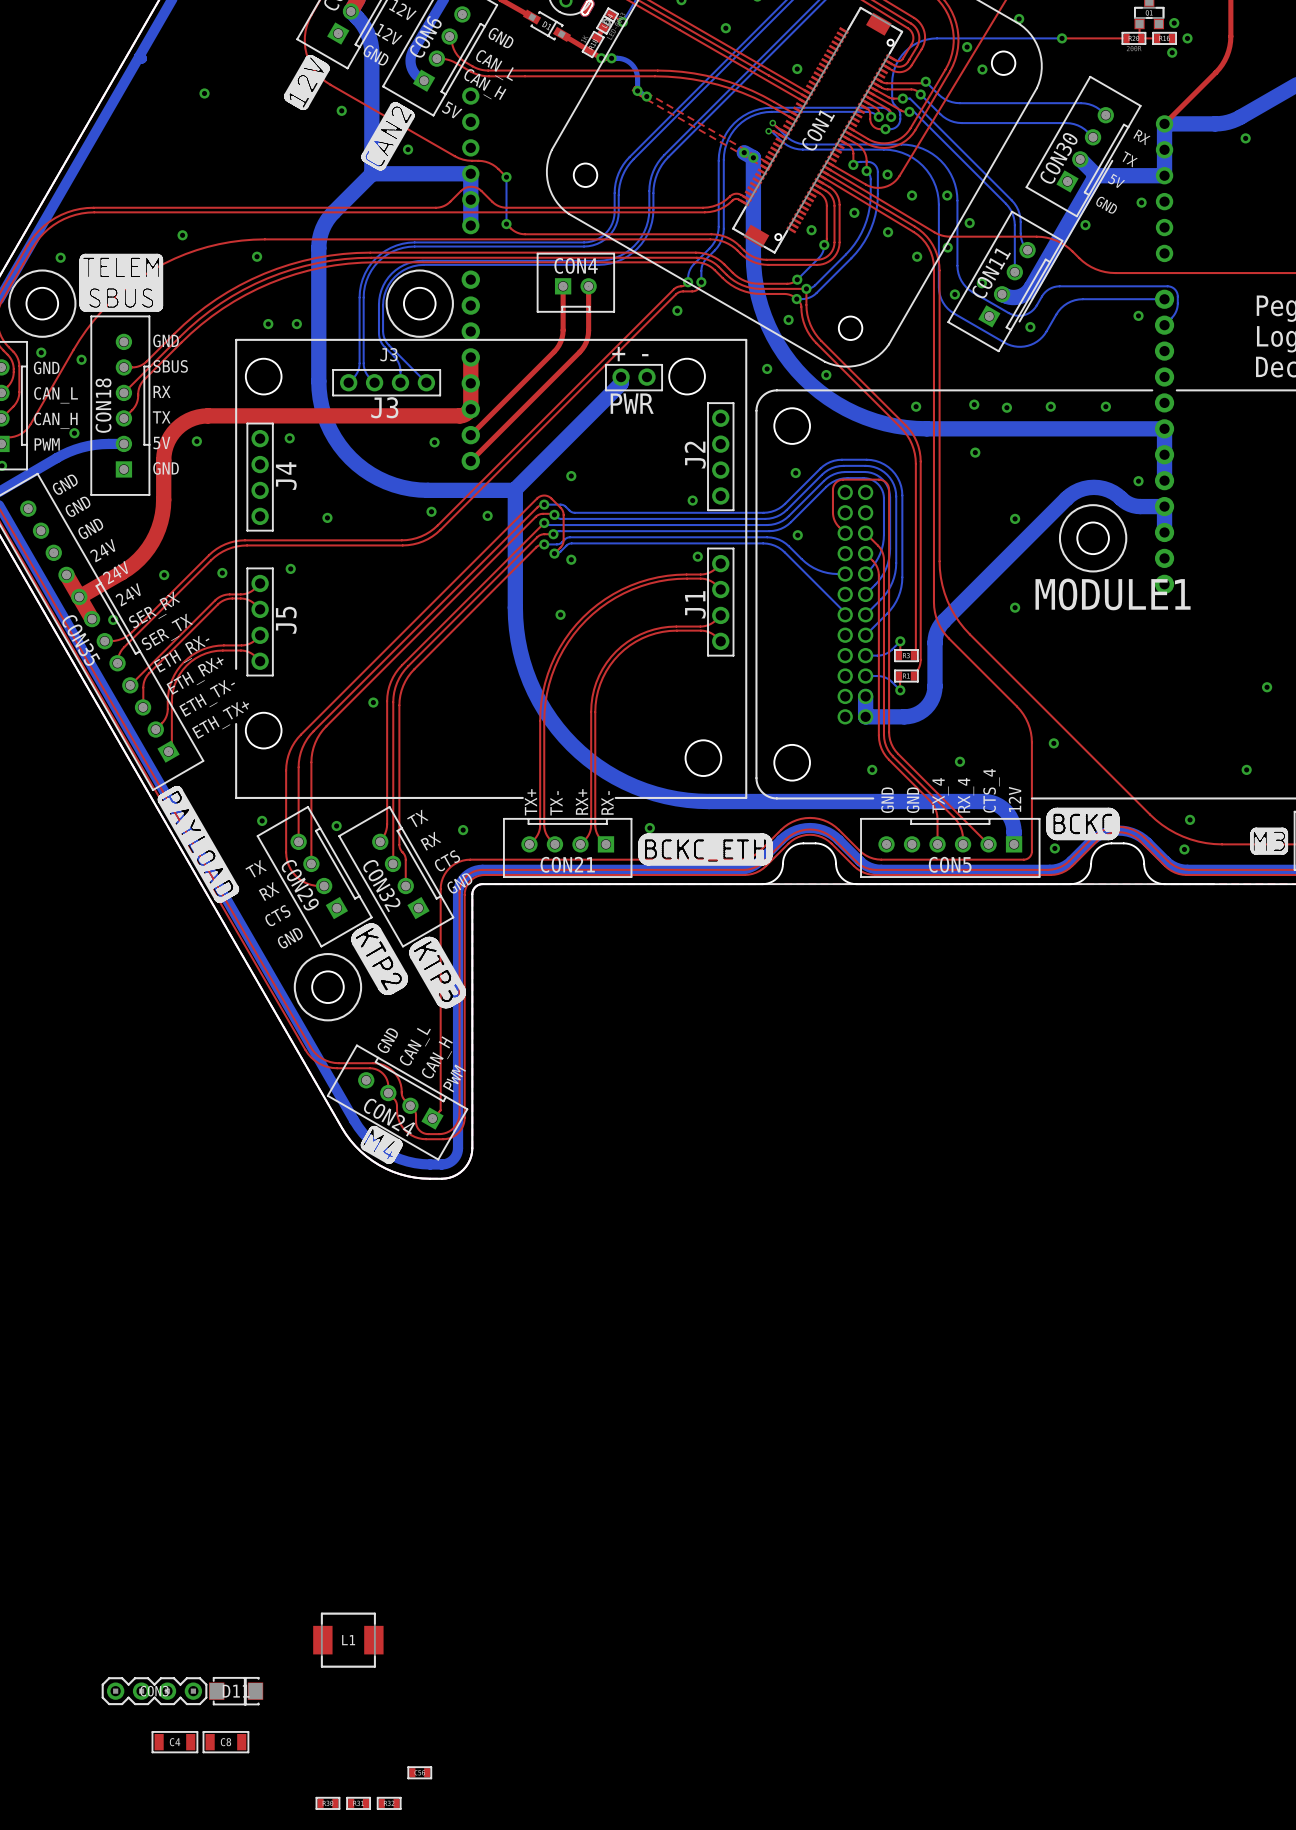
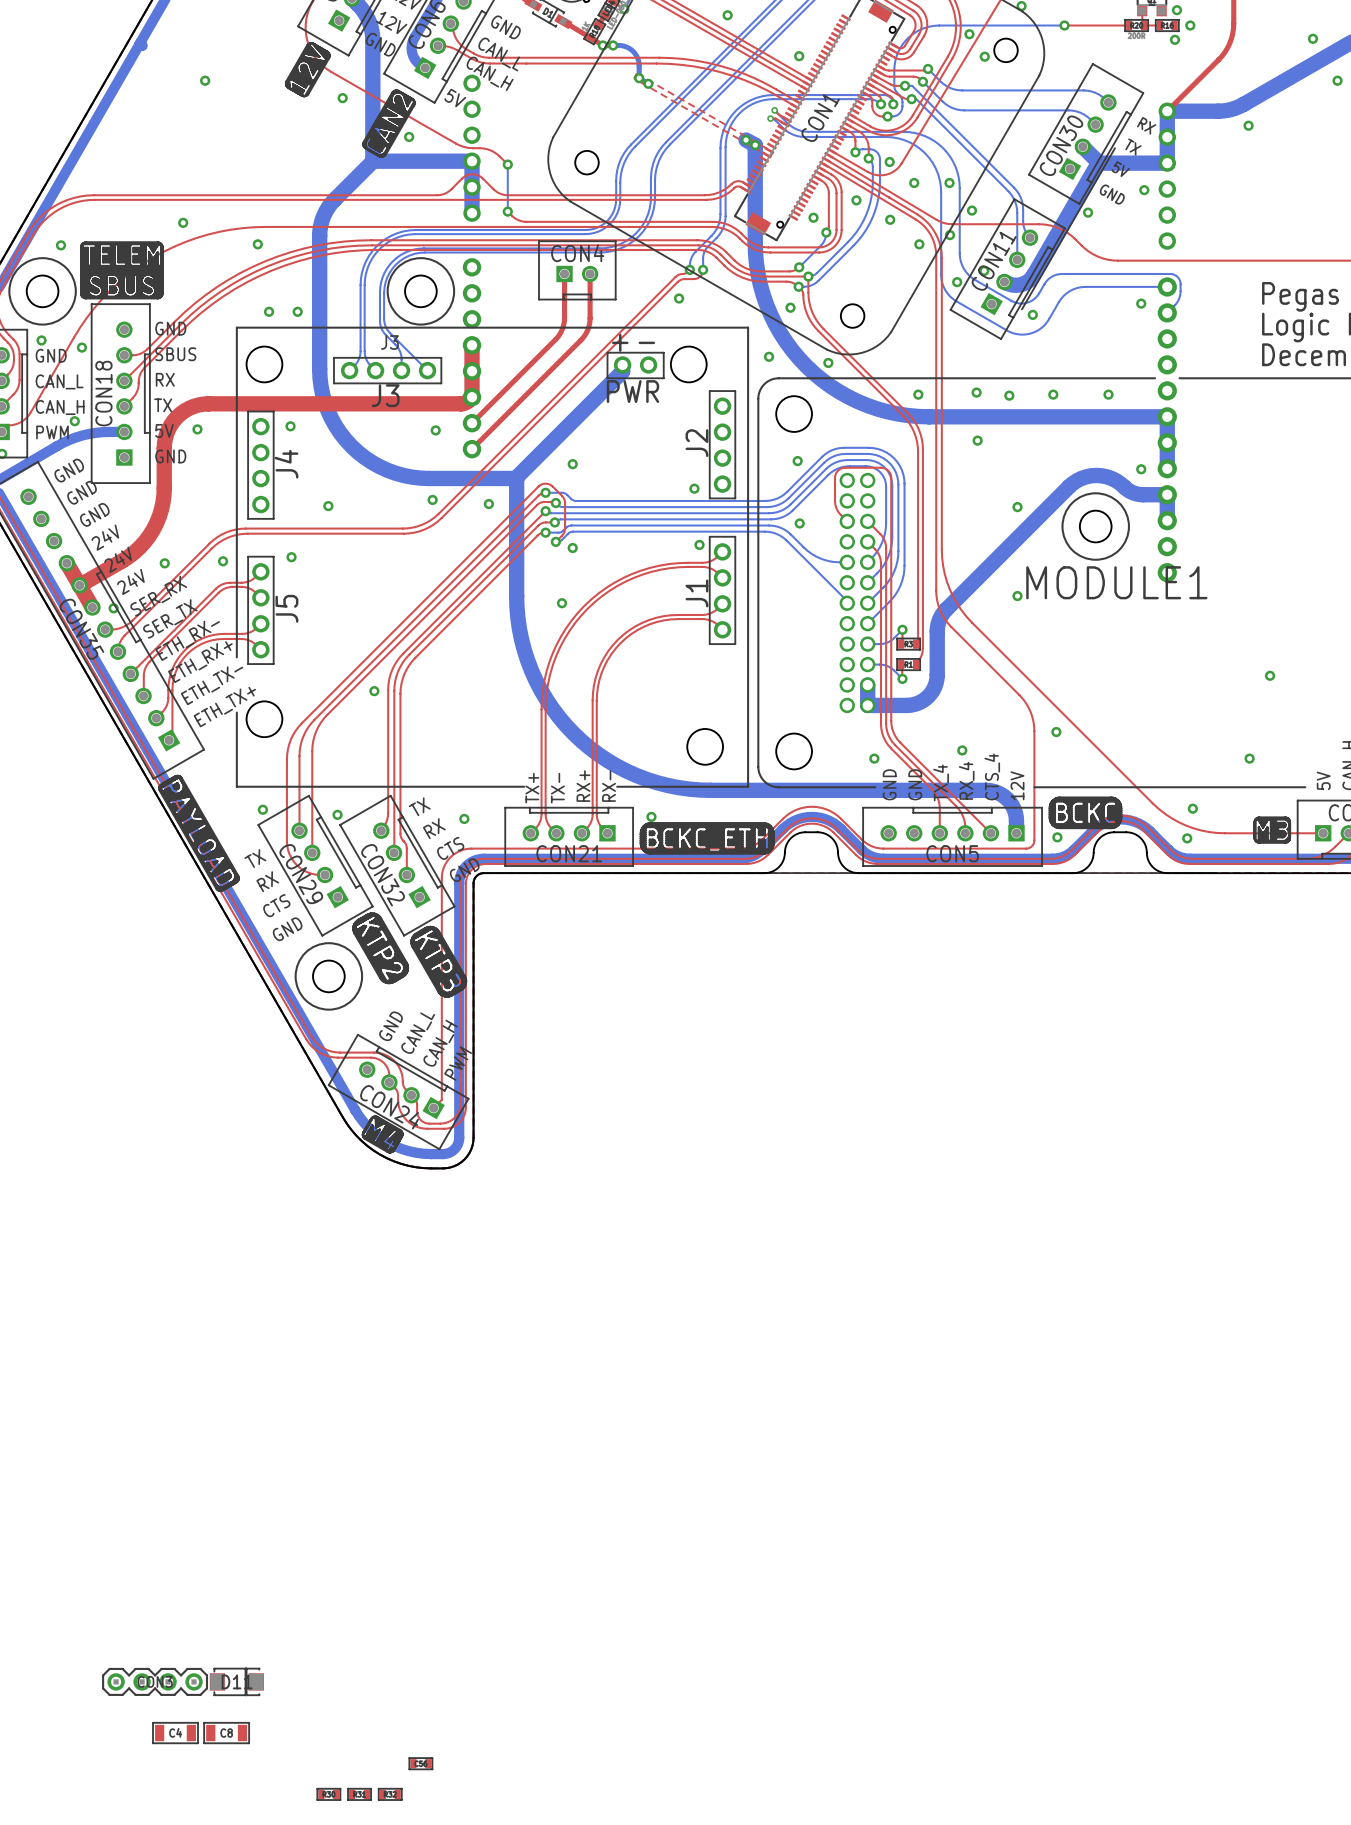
L1: (348, 1640) -> none

